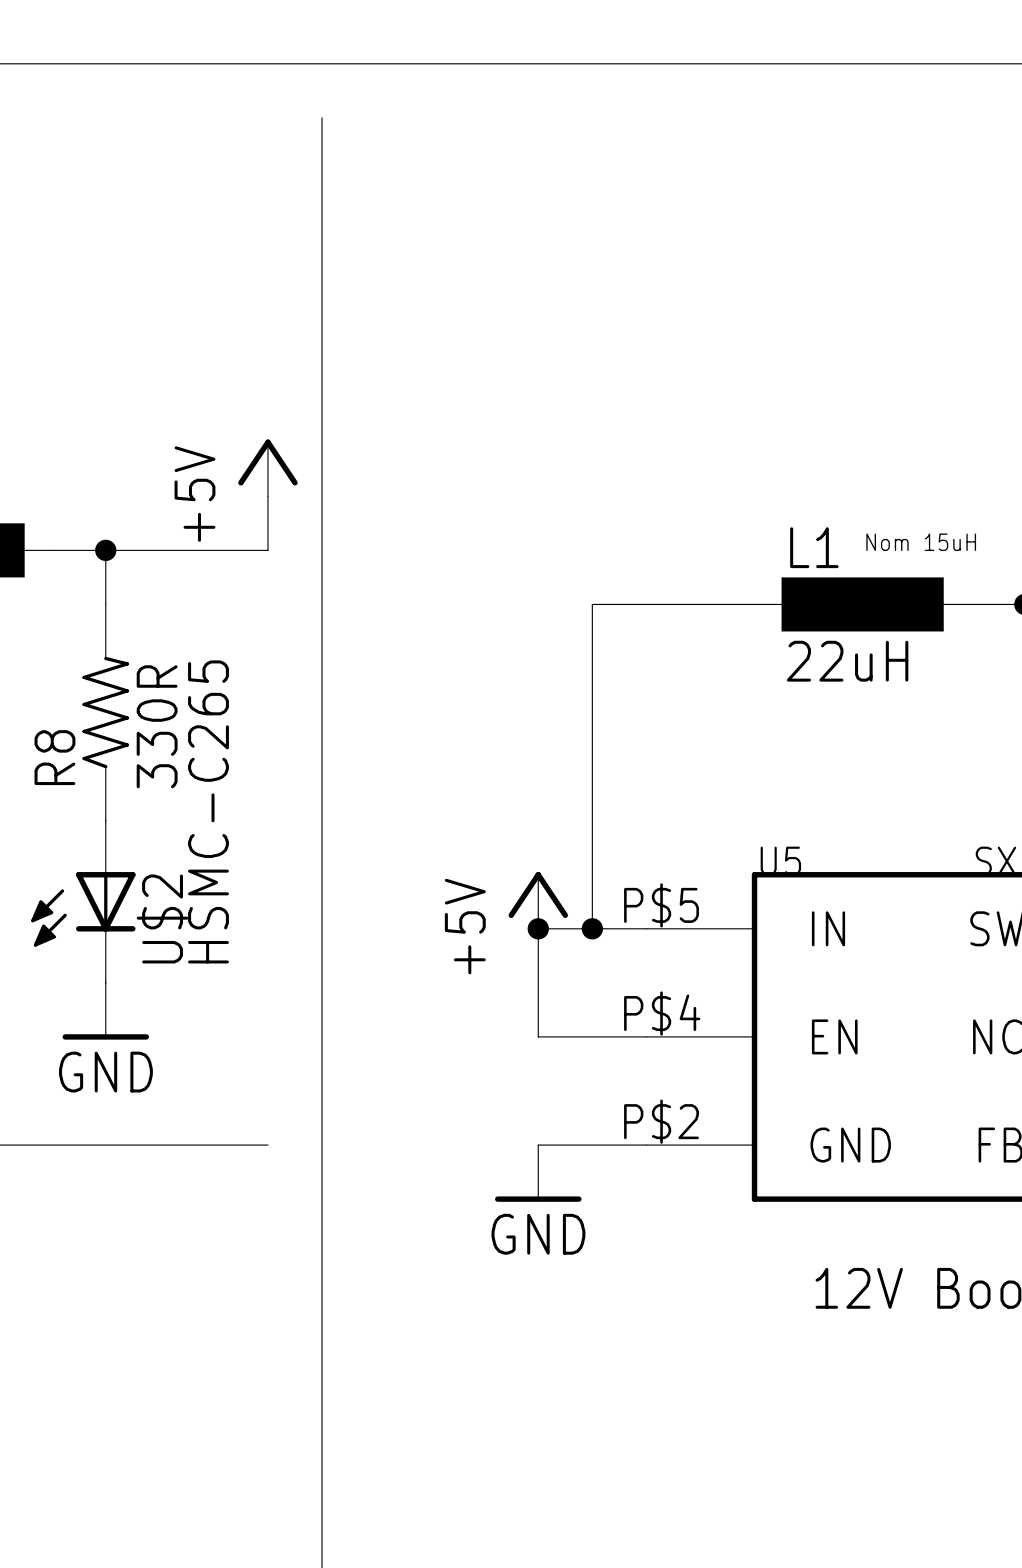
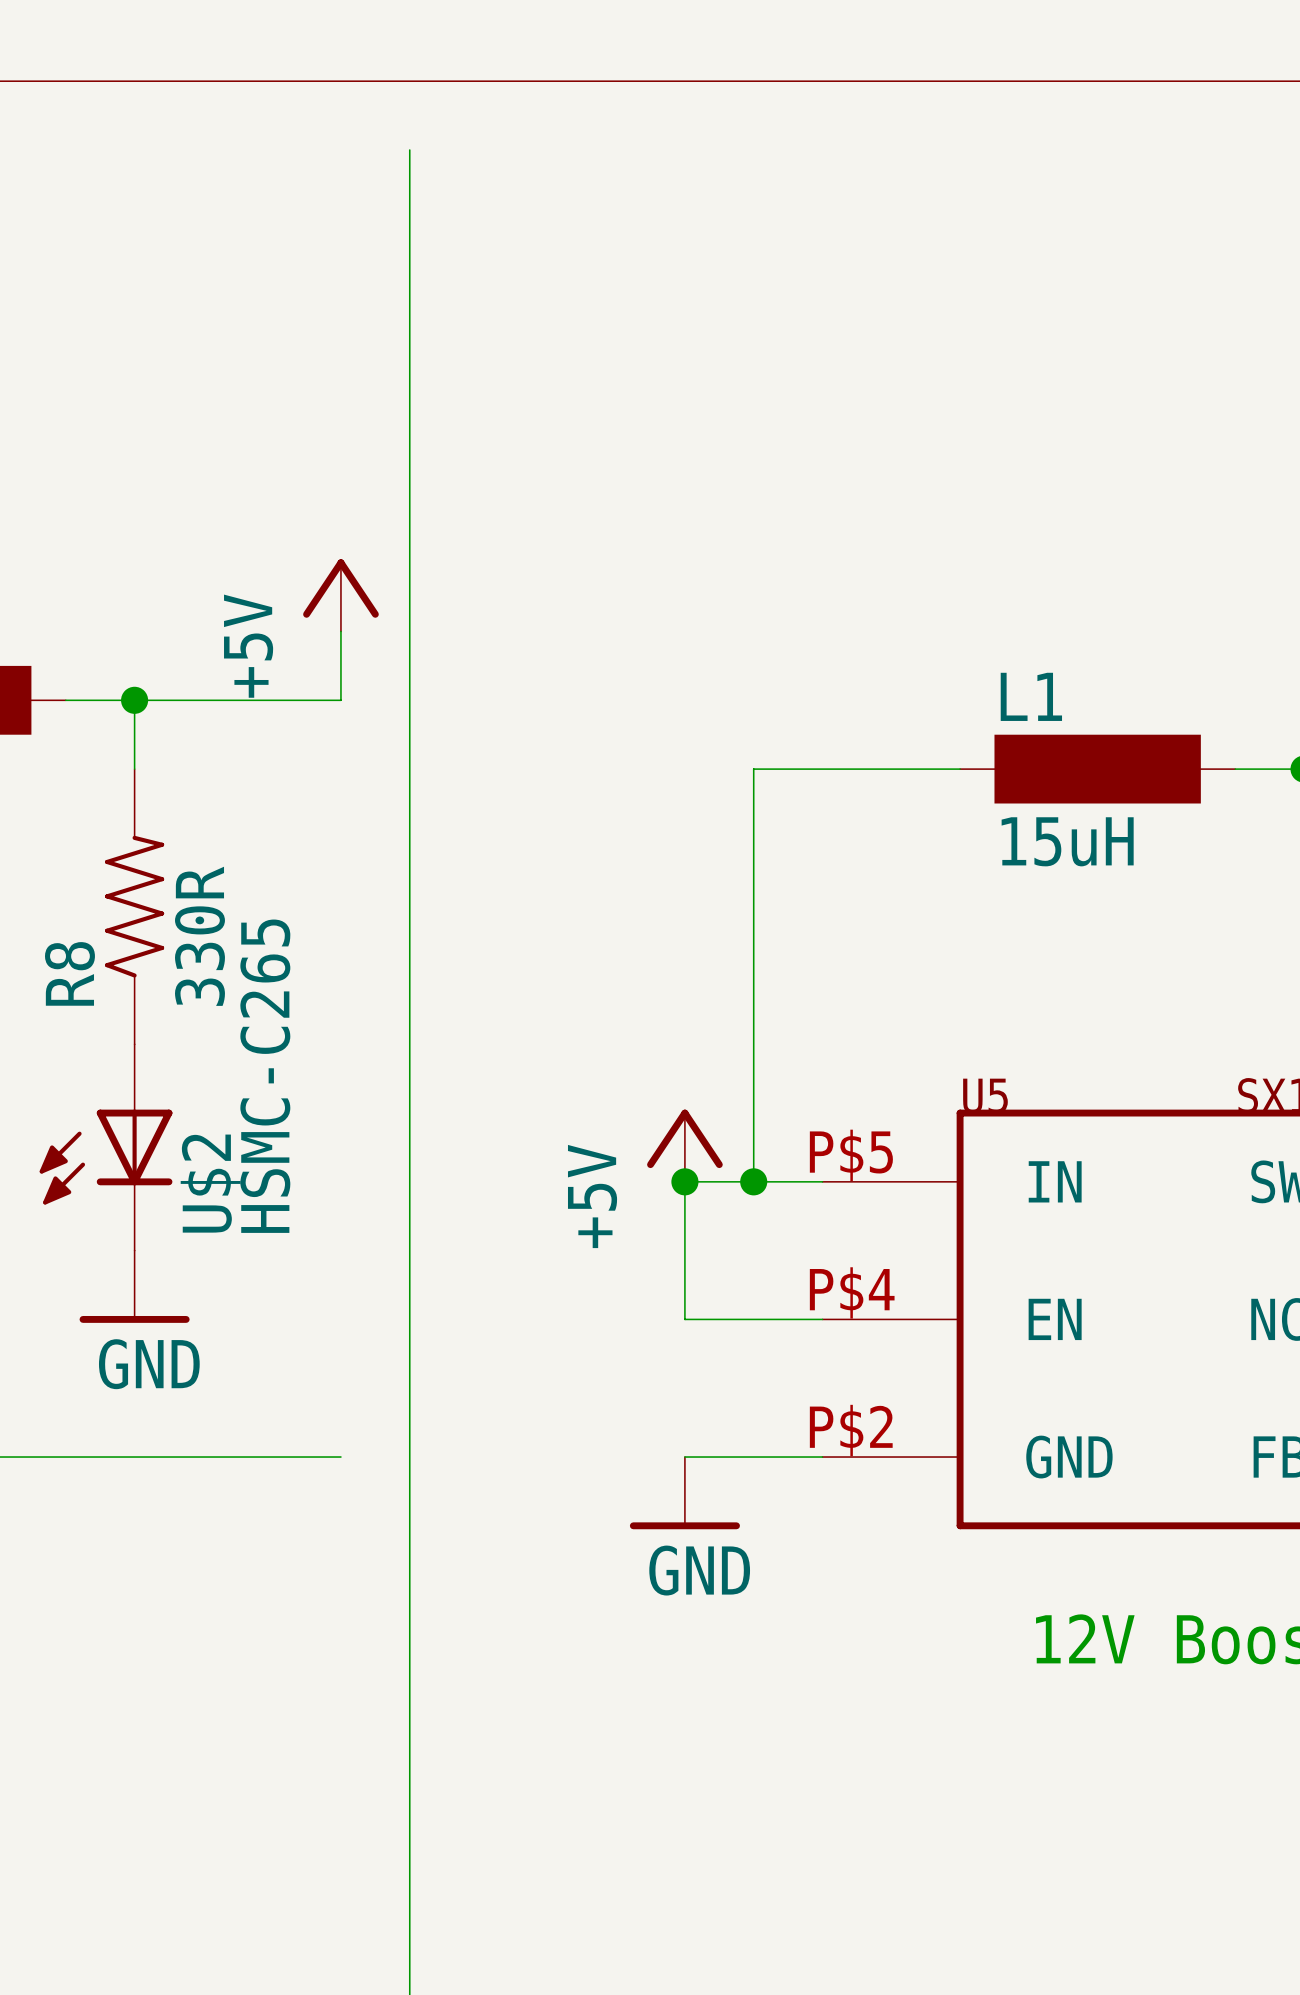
text: Nom 15uH (921, 542) -> none
L1 value: 22uH (847, 661) -> 15uH (1067, 841)

